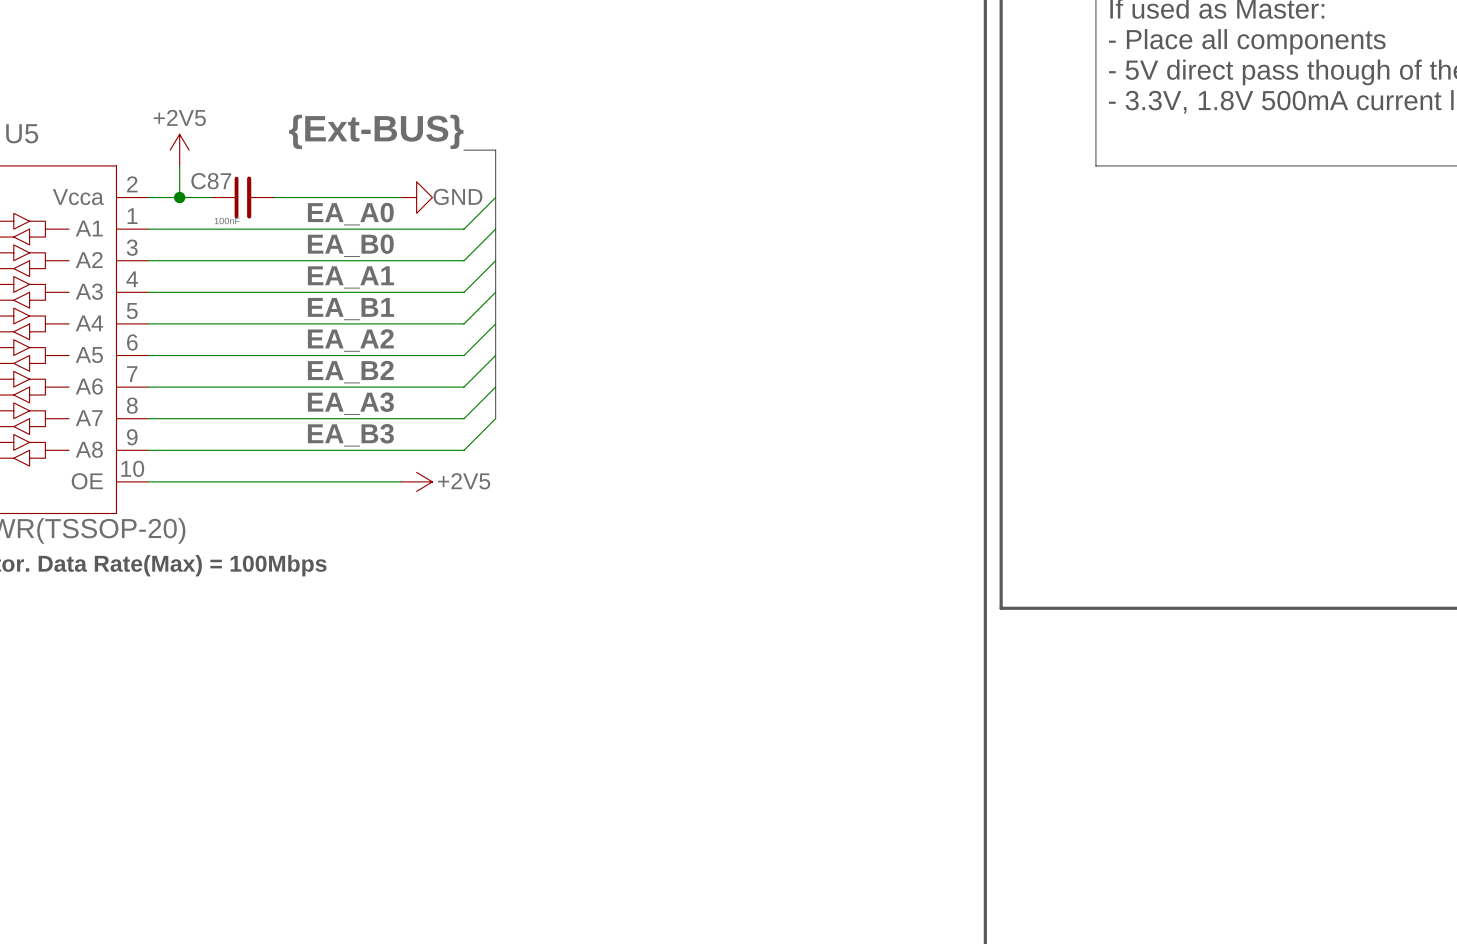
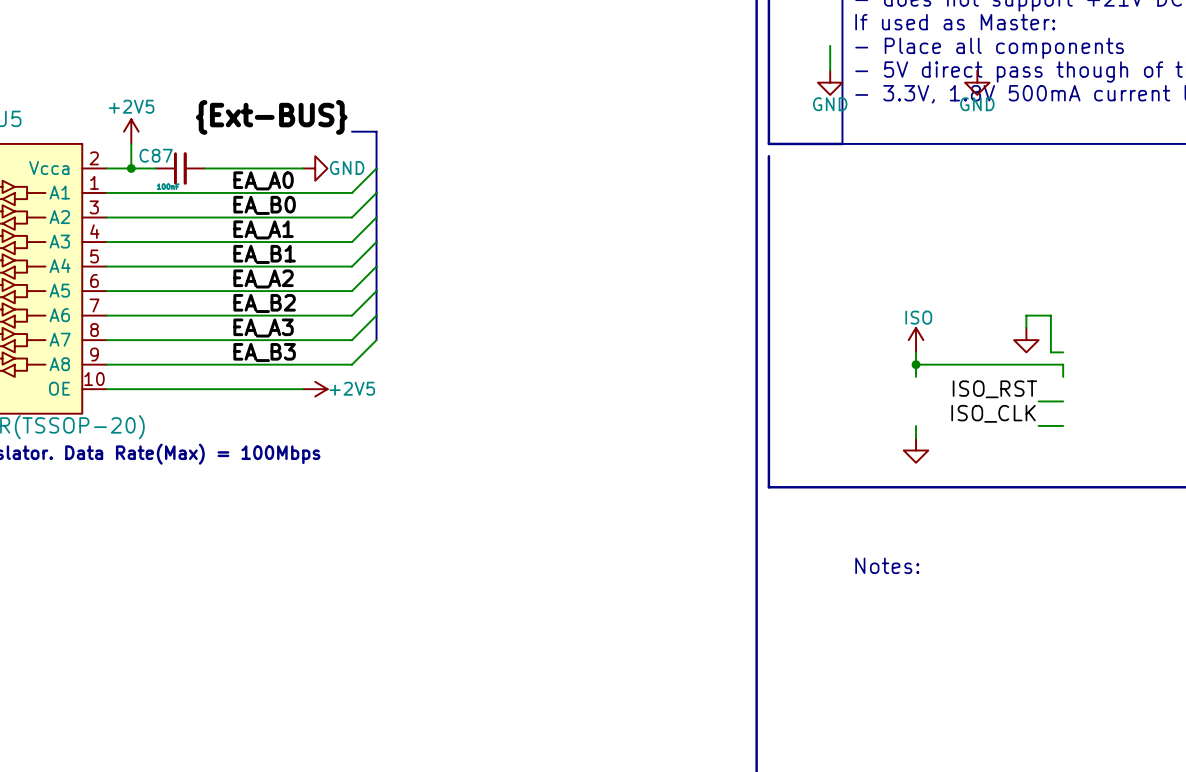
wire: none -> (830, 45) (830, 70)
power symbol: none -> GND (830, 82)
power symbol: none -> GND (977, 82)
line: (1001, 165) (1001, 181) -> (768, 143) (842, 143)
wire: none -> (1026, 327) (1026, 315) (1050, 315) (1050, 352) (1063, 352)
power symbol: none -> ISO (916, 340)
power symbol: none -> (1026, 340)
wire: none -> (916, 352) (916, 376)
wire: none -> (916, 364) (1063, 364) (1063, 376)
junction: none -> (916, 364)
label: none -> ISO_RST (994, 389)
wire: none -> (1038, 401) (1063, 401)
label: none -> ISO_CLK (993, 413)
wire: none -> (916, 425) (916, 438)
wire: none -> (1038, 425) (1063, 425)
power symbol: none -> (916, 450)
text: none -> Notes: (887, 565)

